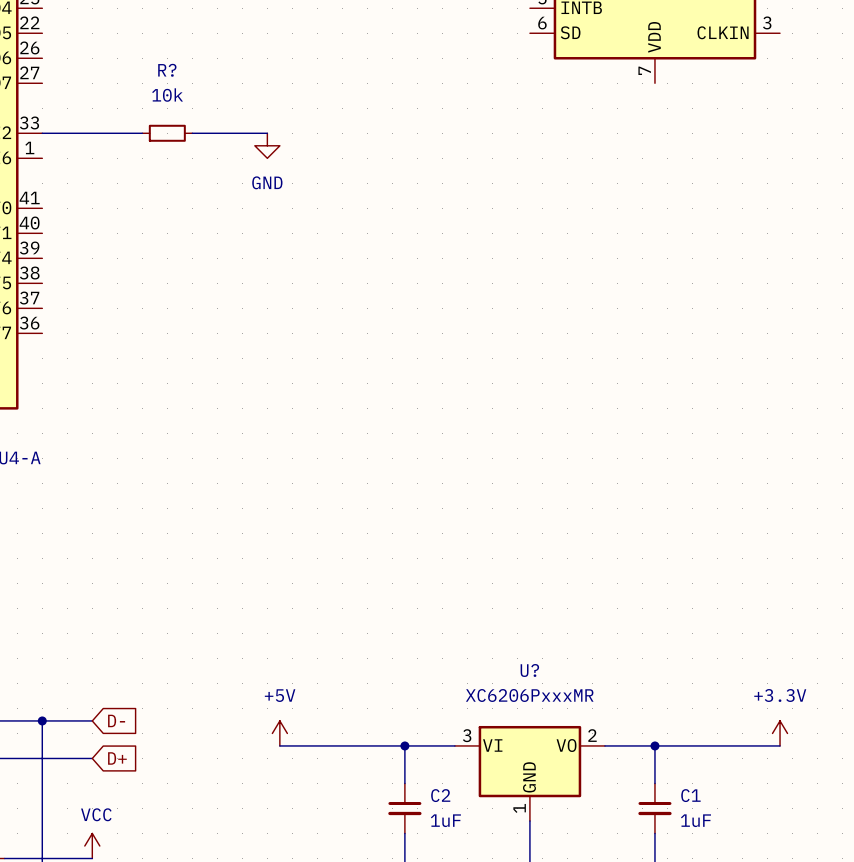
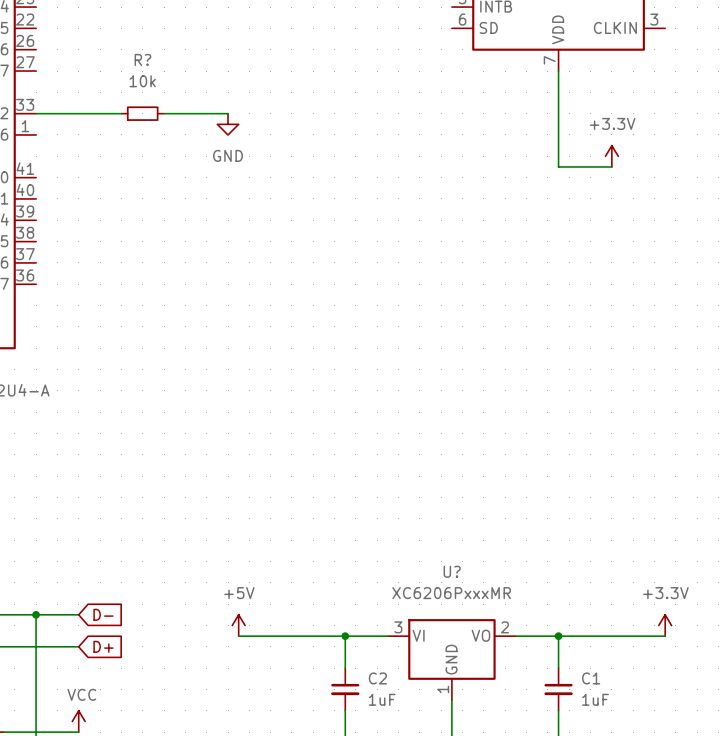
wire: none -> (558, 71) (558, 166) (611, 166)
power symbol: none -> +3.3V (611, 156)

